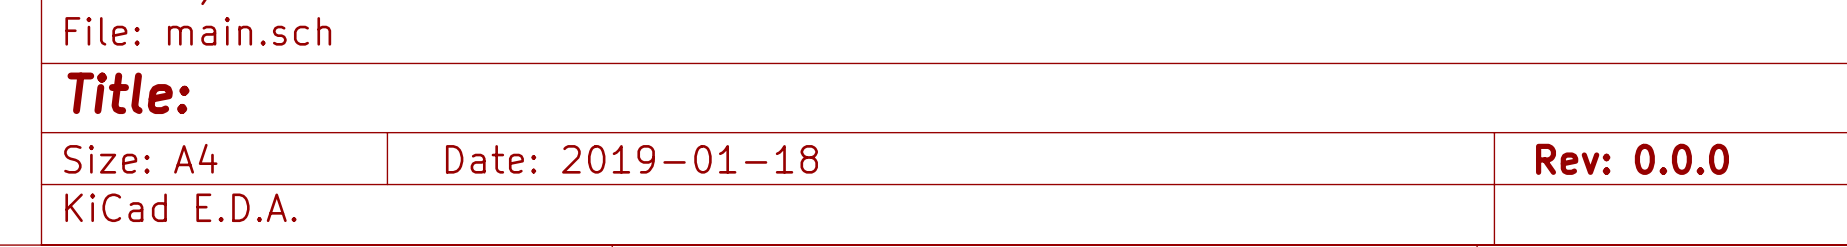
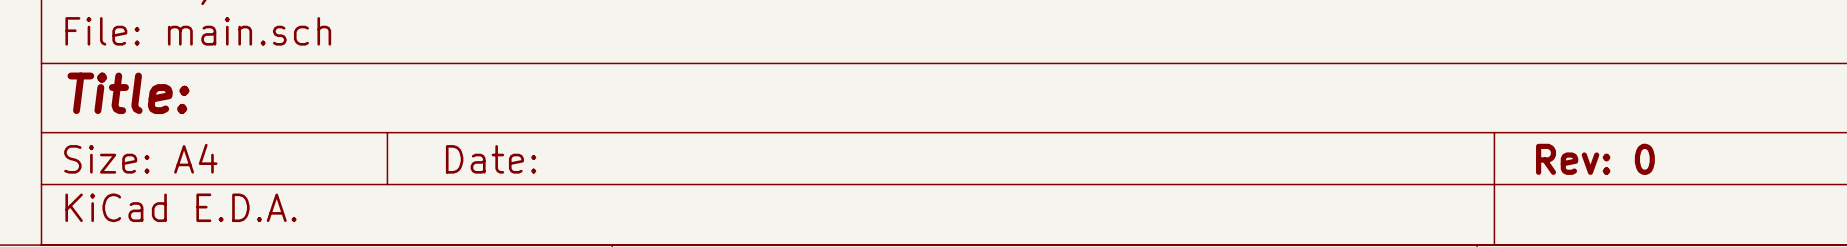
title block: Date: 2019-01-18 (631, 159) -> Date: (491, 159)
title block: Rev: 0.0.0 (1632, 159) -> Rev: 0 (1595, 159)

